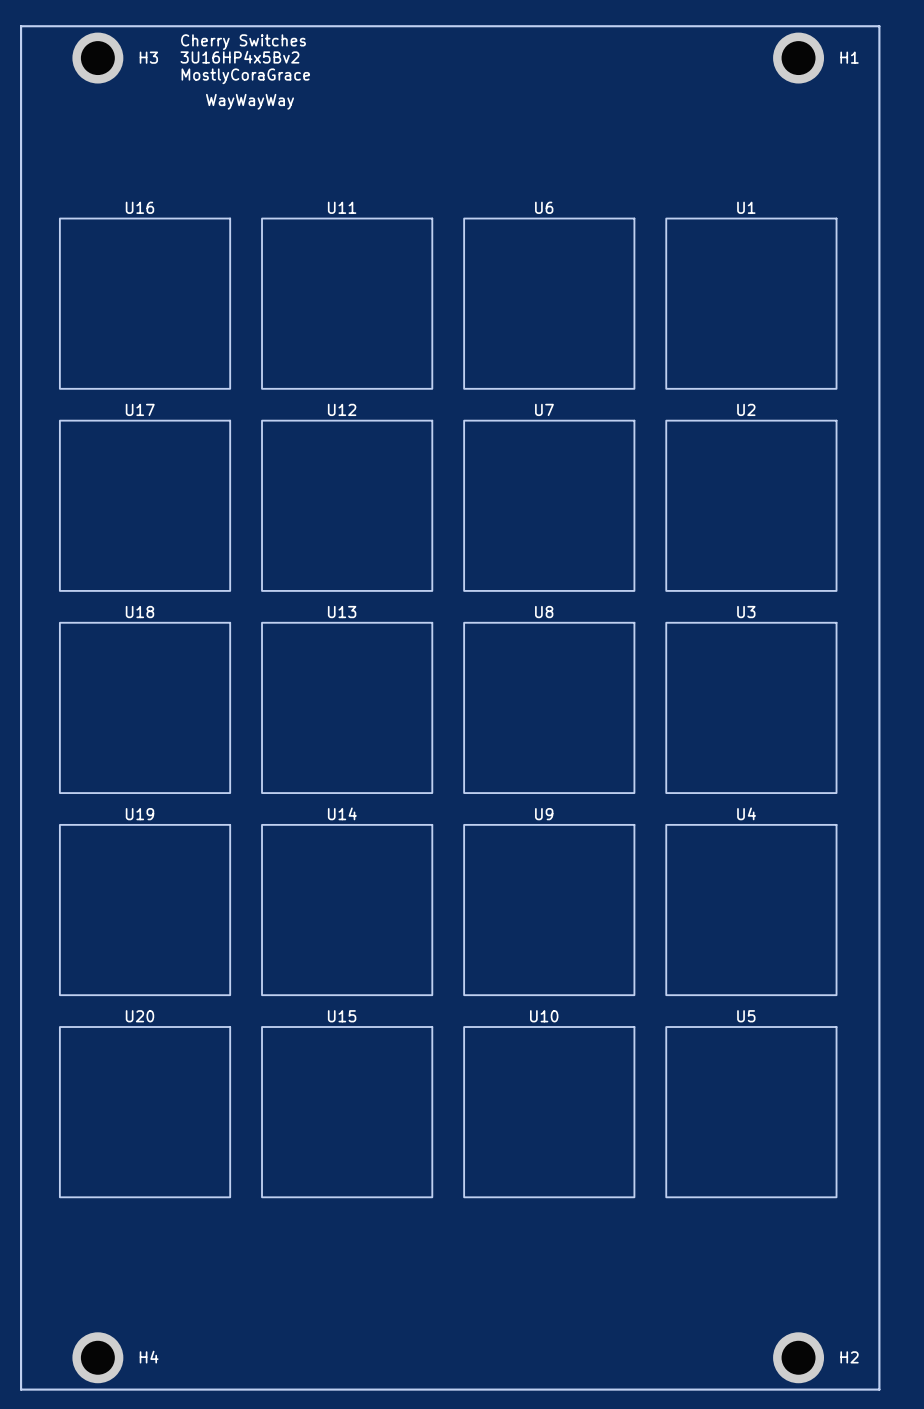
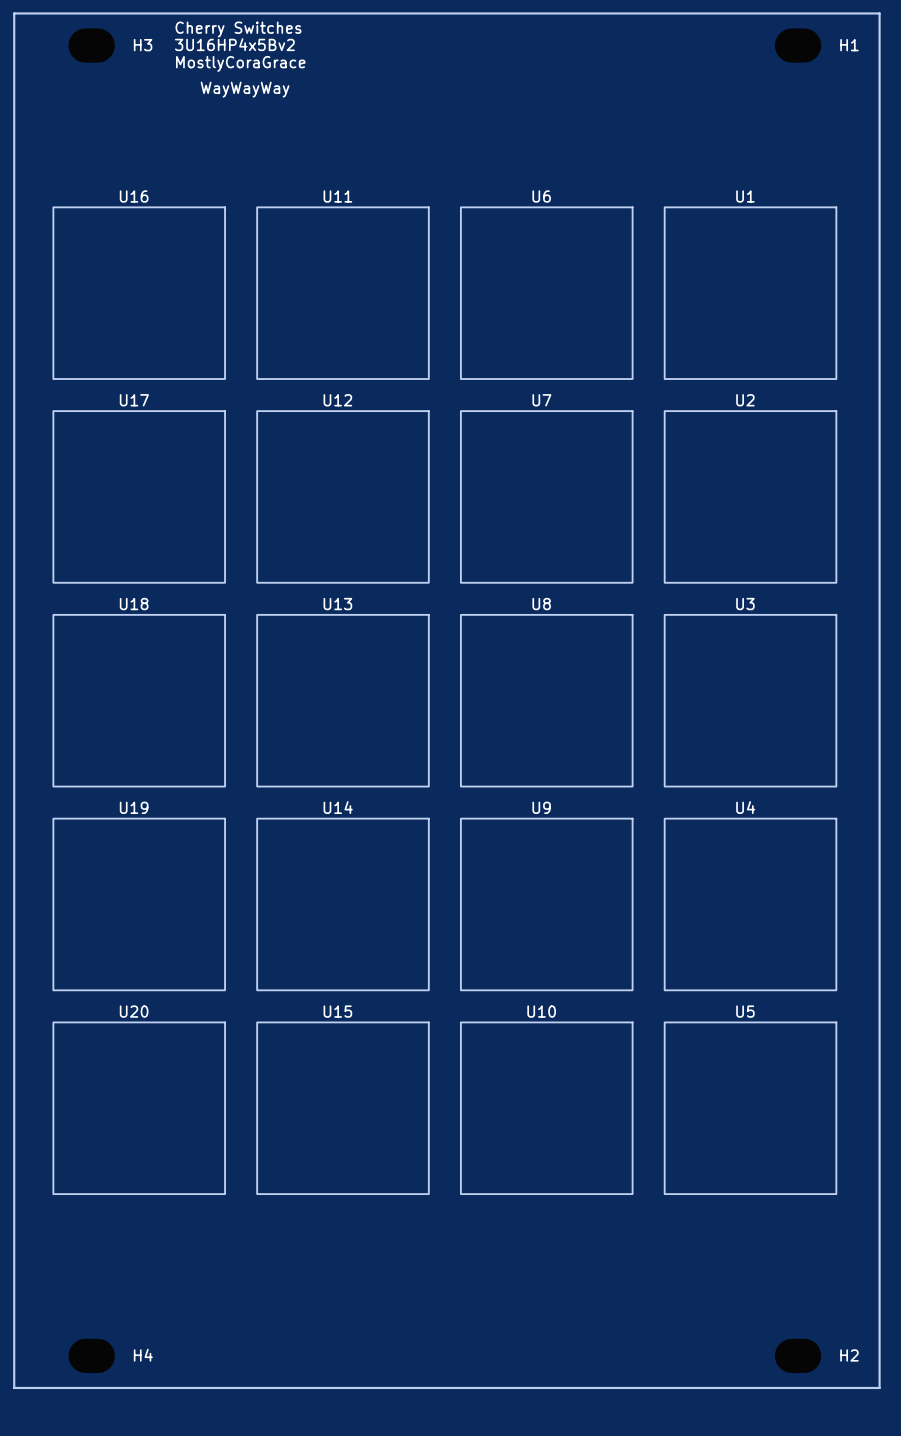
H3 footprint: [72, 32, 124, 84] -> [68, 28, 115, 63]
H1 footprint: [773, 32, 825, 84] -> [774, 28, 822, 63]
H4 footprint: [72, 1332, 124, 1384] -> [68, 1338, 115, 1373]
H2 footprint: [773, 1332, 825, 1384] -> [774, 1338, 822, 1373]

